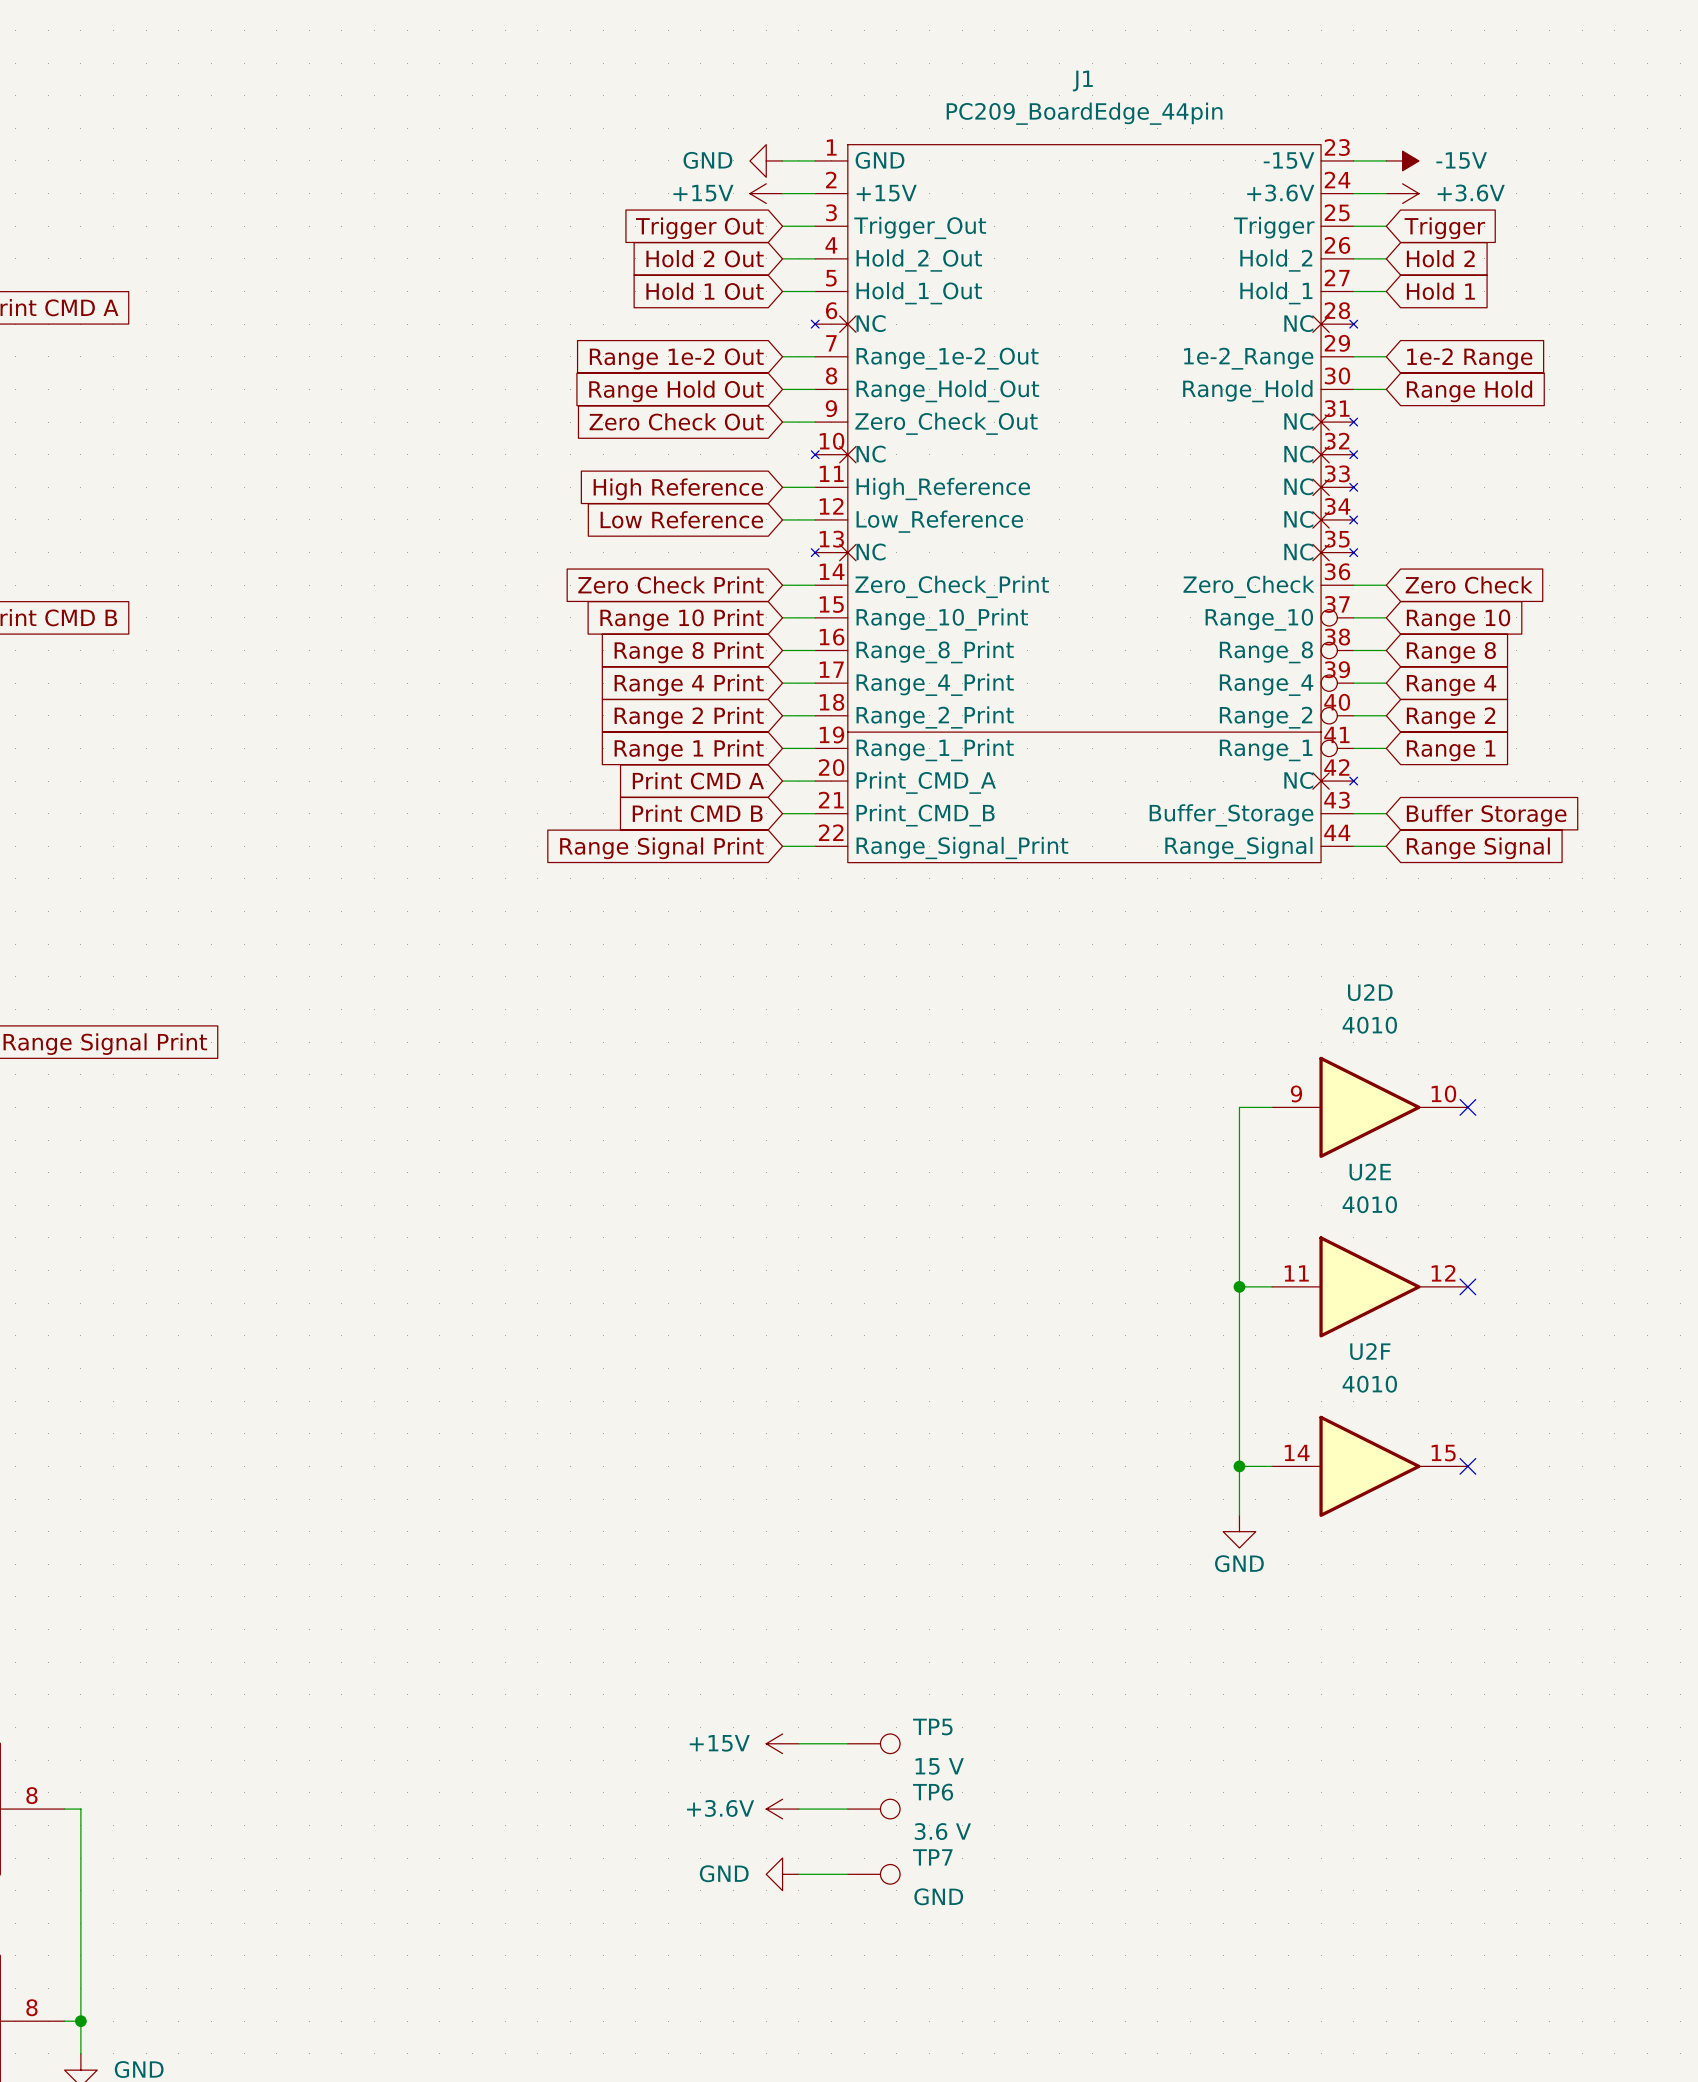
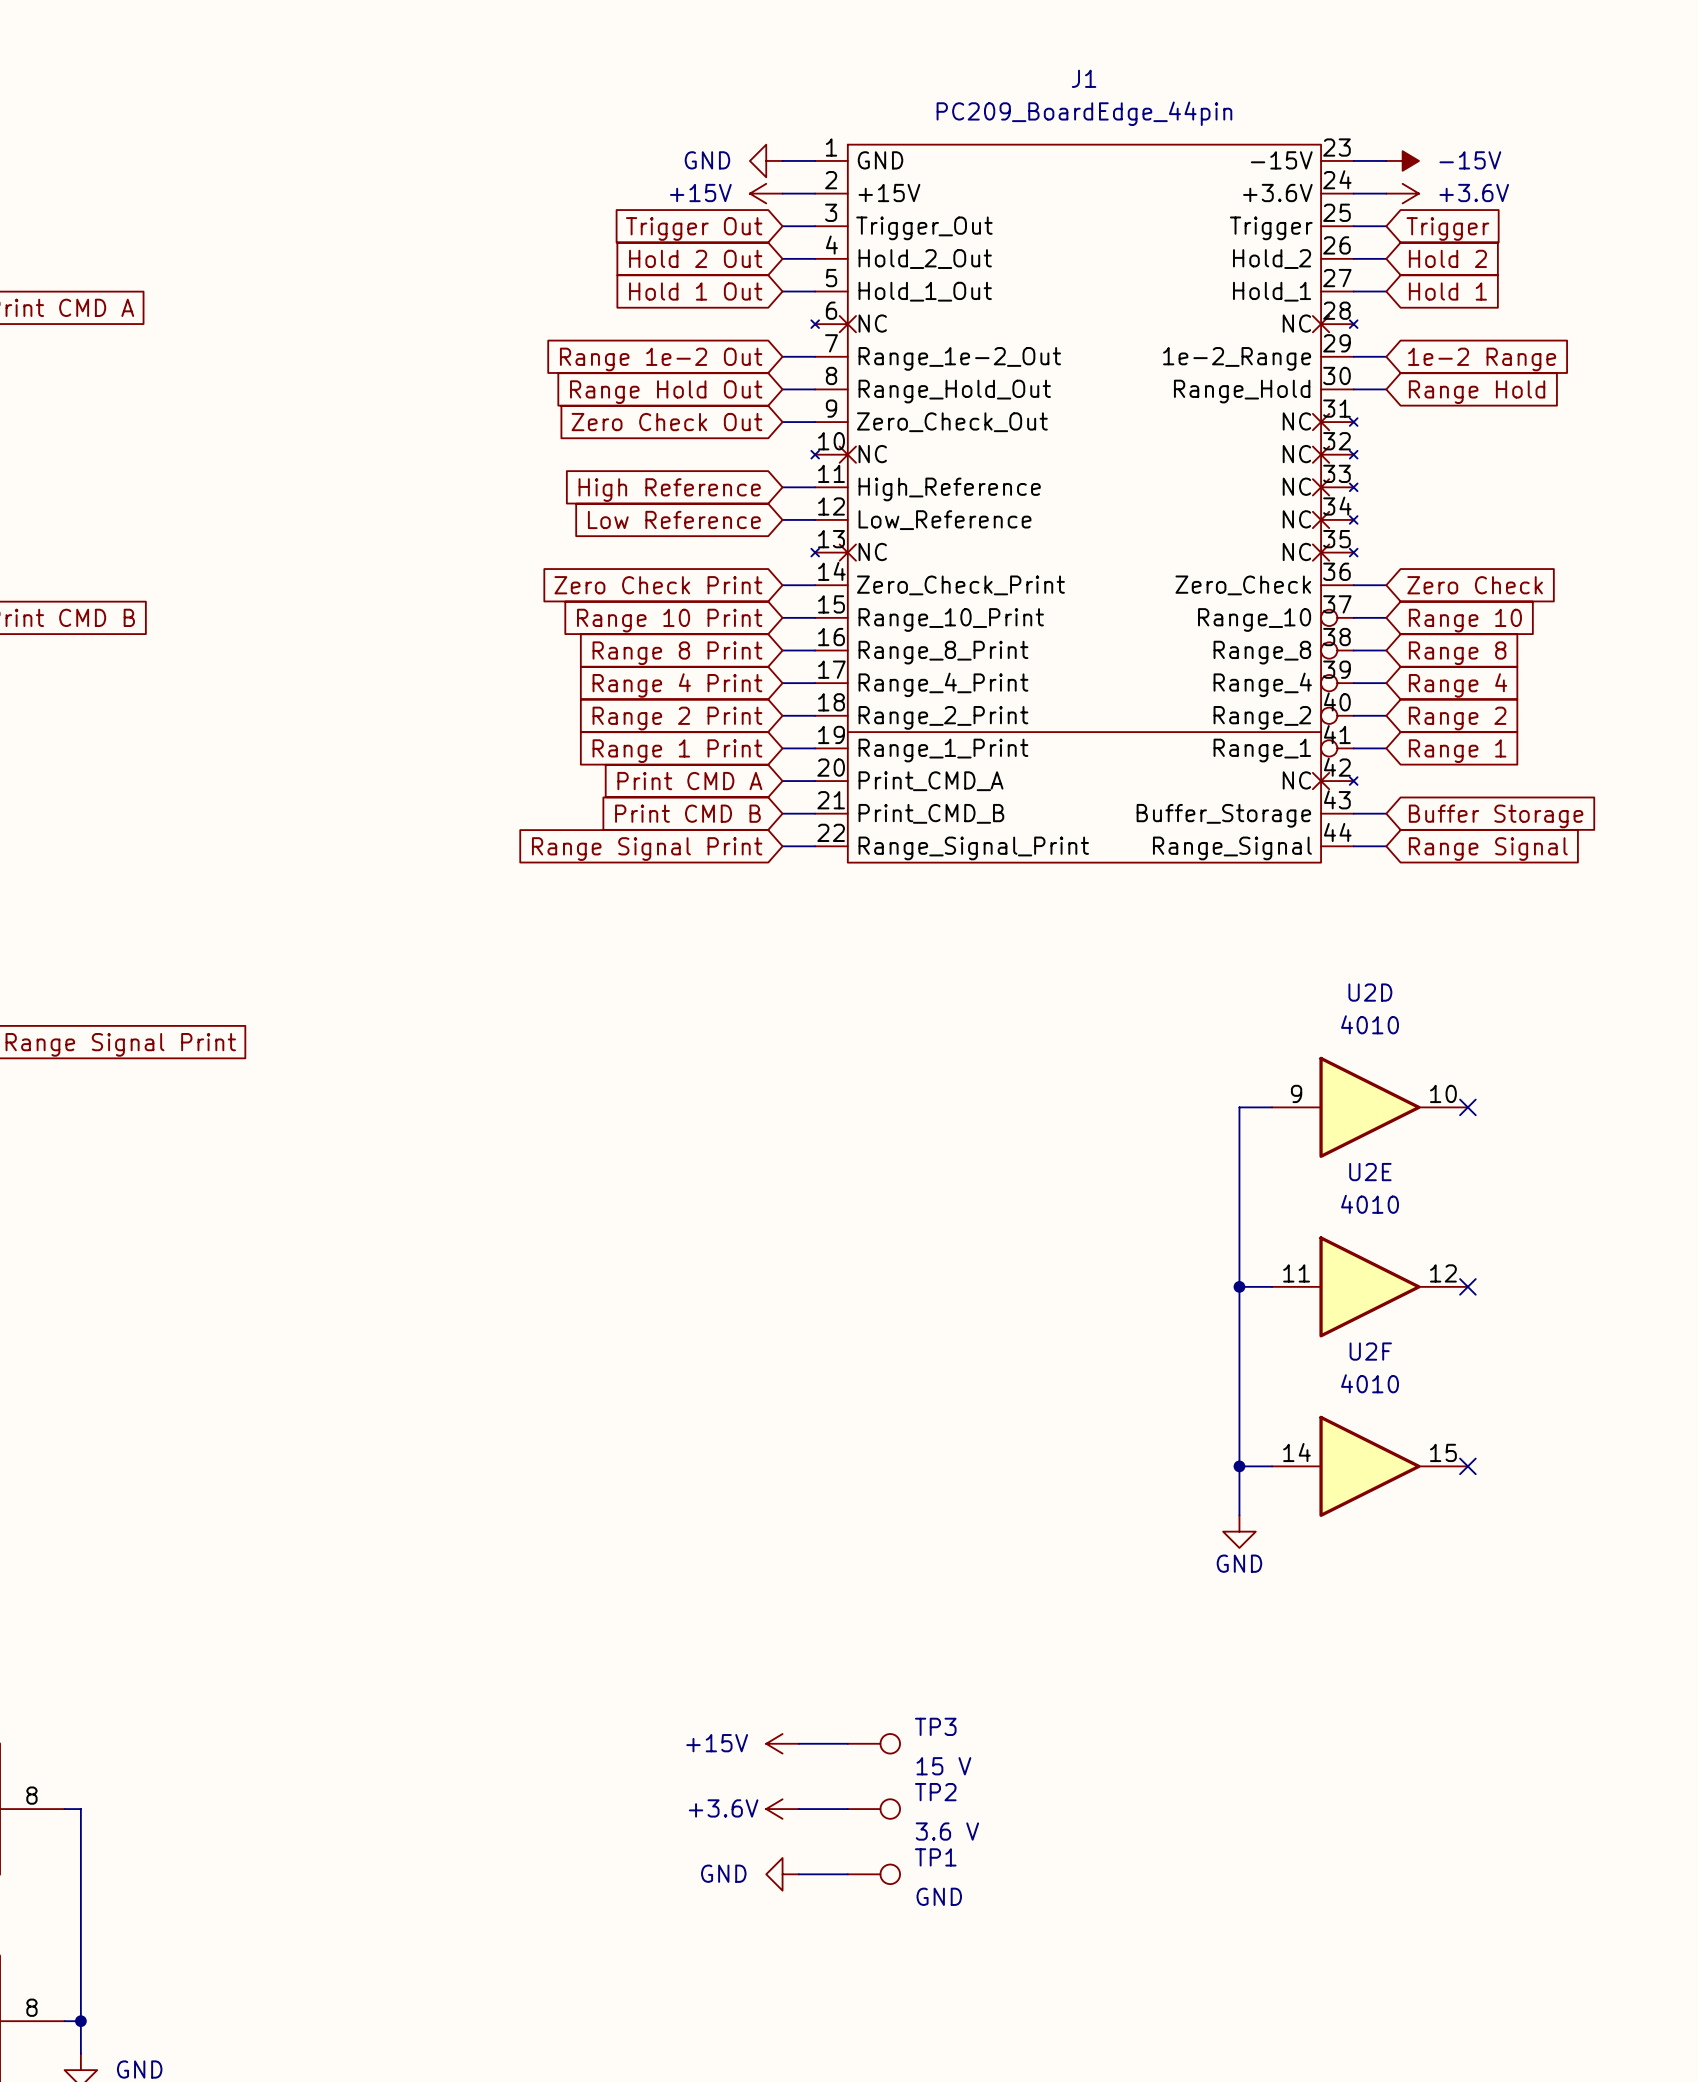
TP5 name: TP5 (932, 1727) -> TP3 (935, 1726)
TP6 name: TP6 (933, 1792) -> TP2 (935, 1792)
TP7 name: TP7 (932, 1857) -> TP1 (935, 1857)

